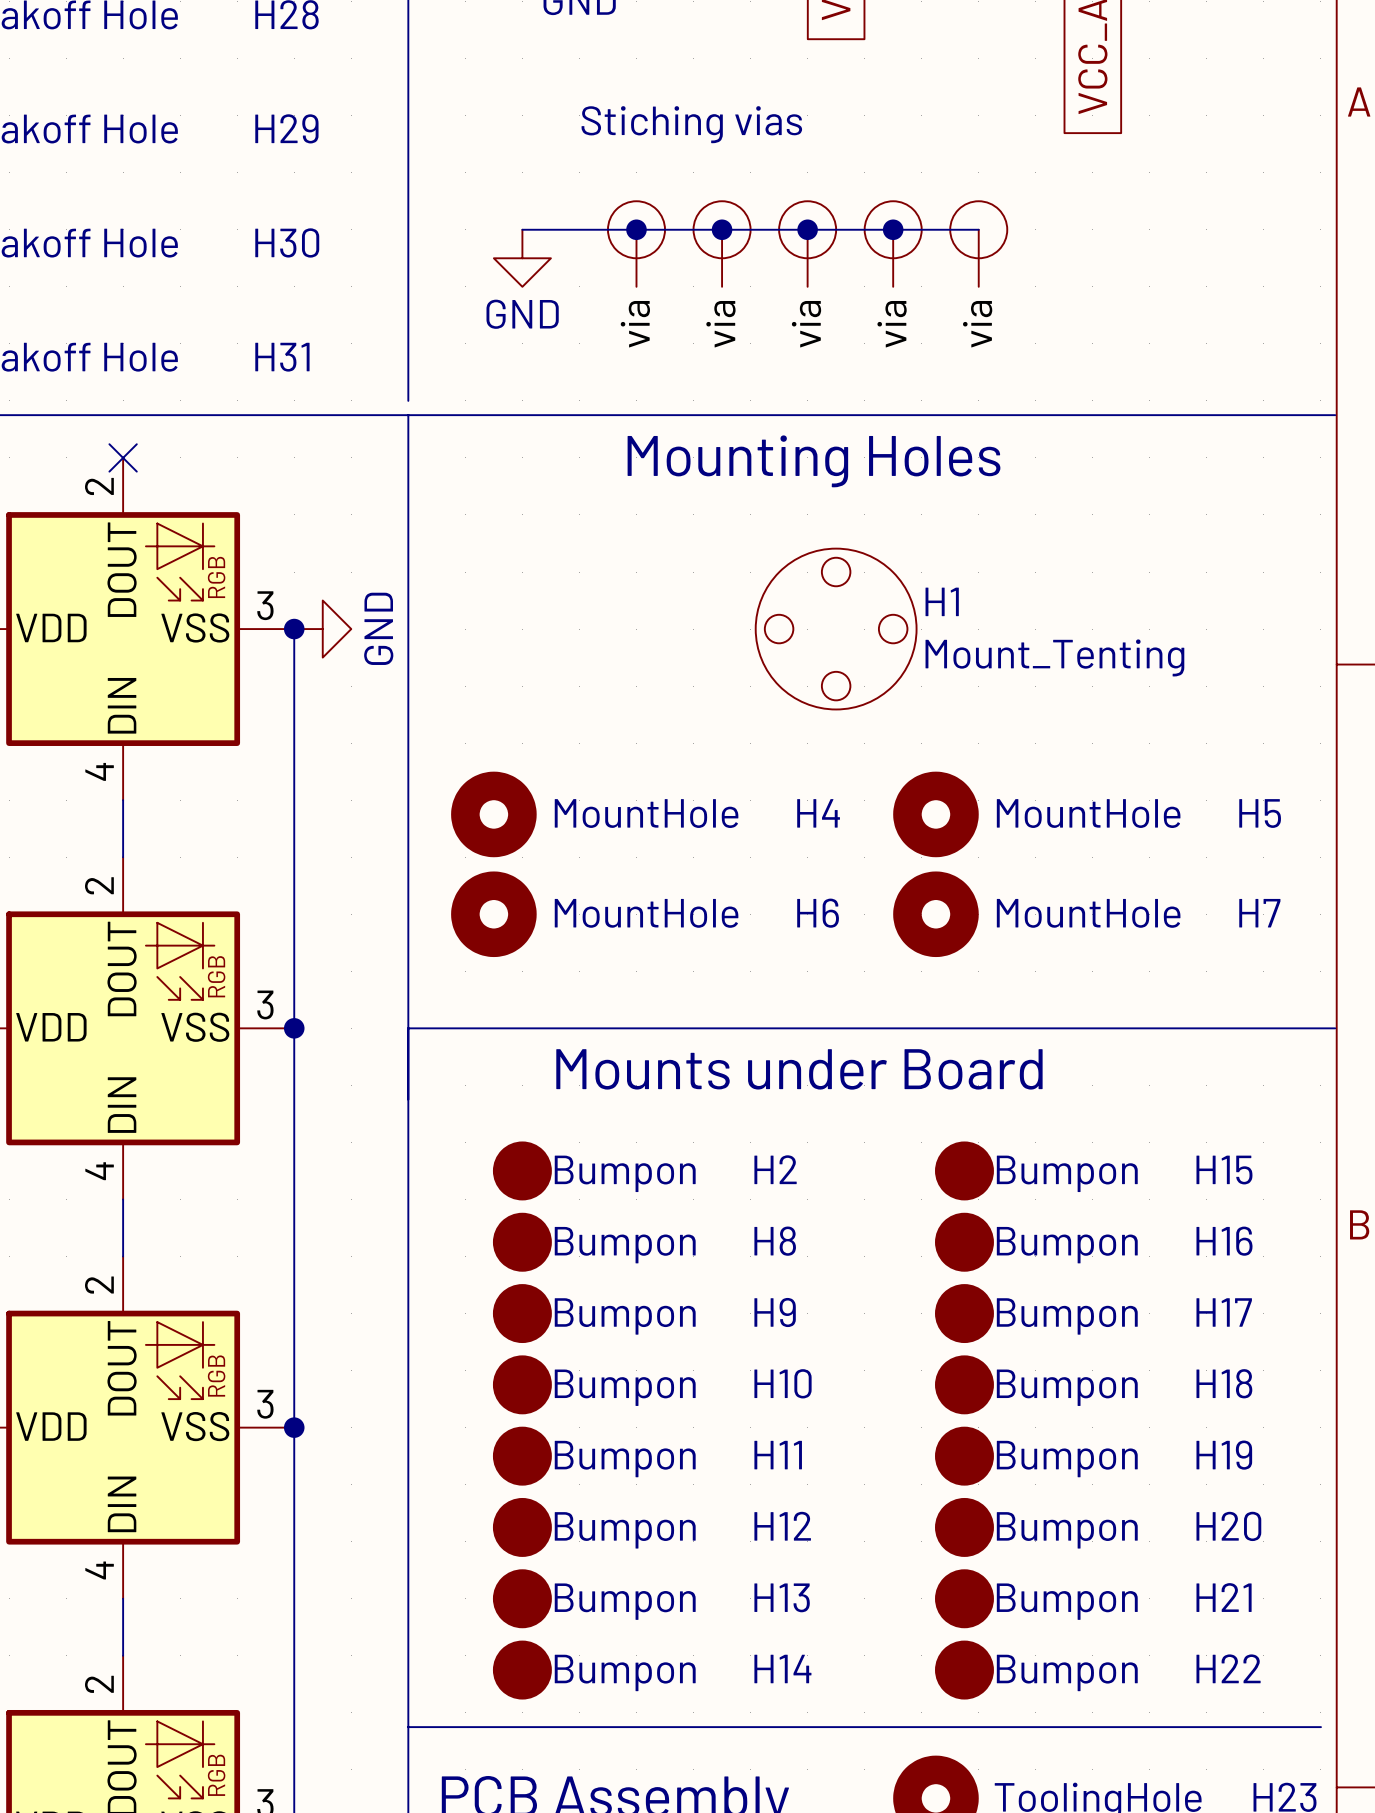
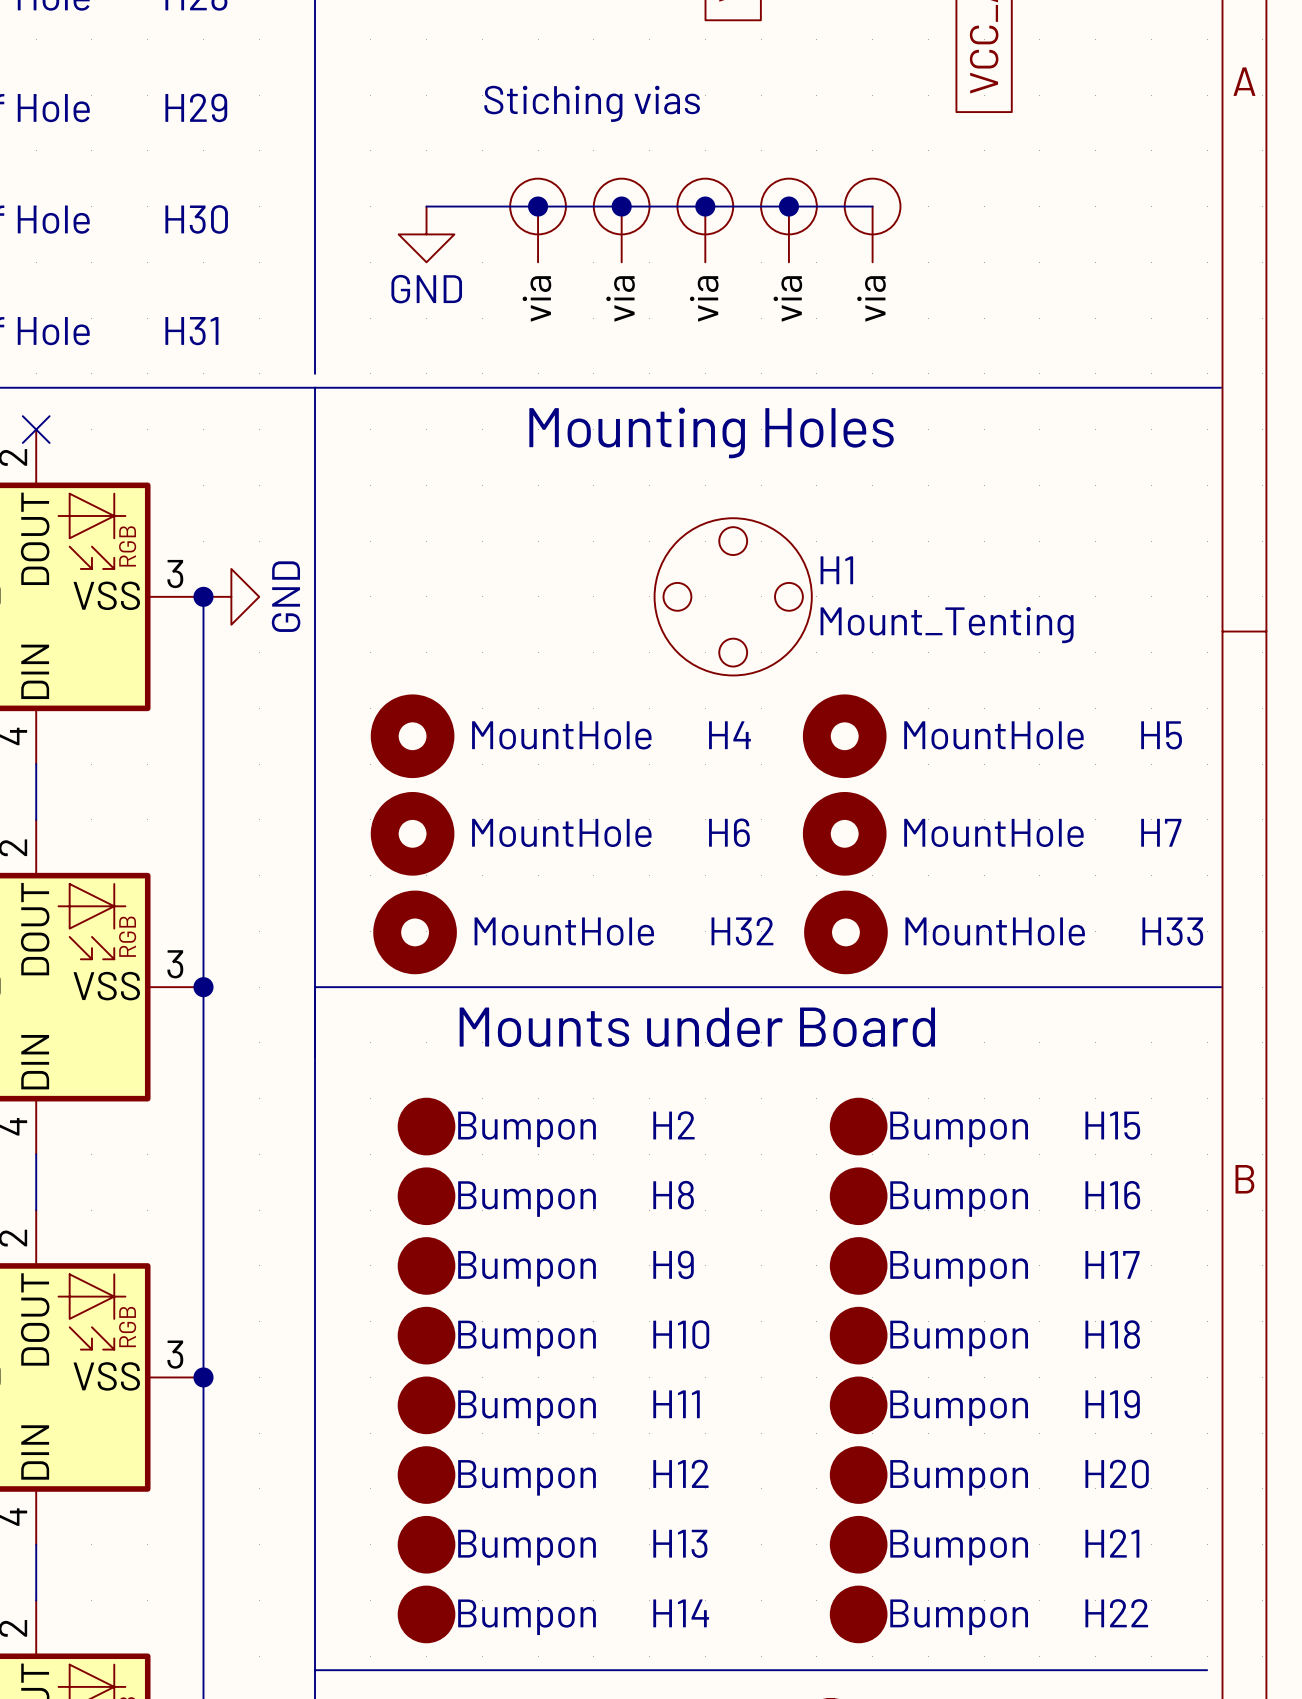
H4 position: (493, 814) -> (412, 736)
H5 position: (935, 814) -> (844, 736)
H6 position: (493, 914) -> (412, 833)
H7 position: (935, 914) -> (844, 833)
H32: none -> MountHole (415, 932)
H33: none -> MountHole (845, 932)

